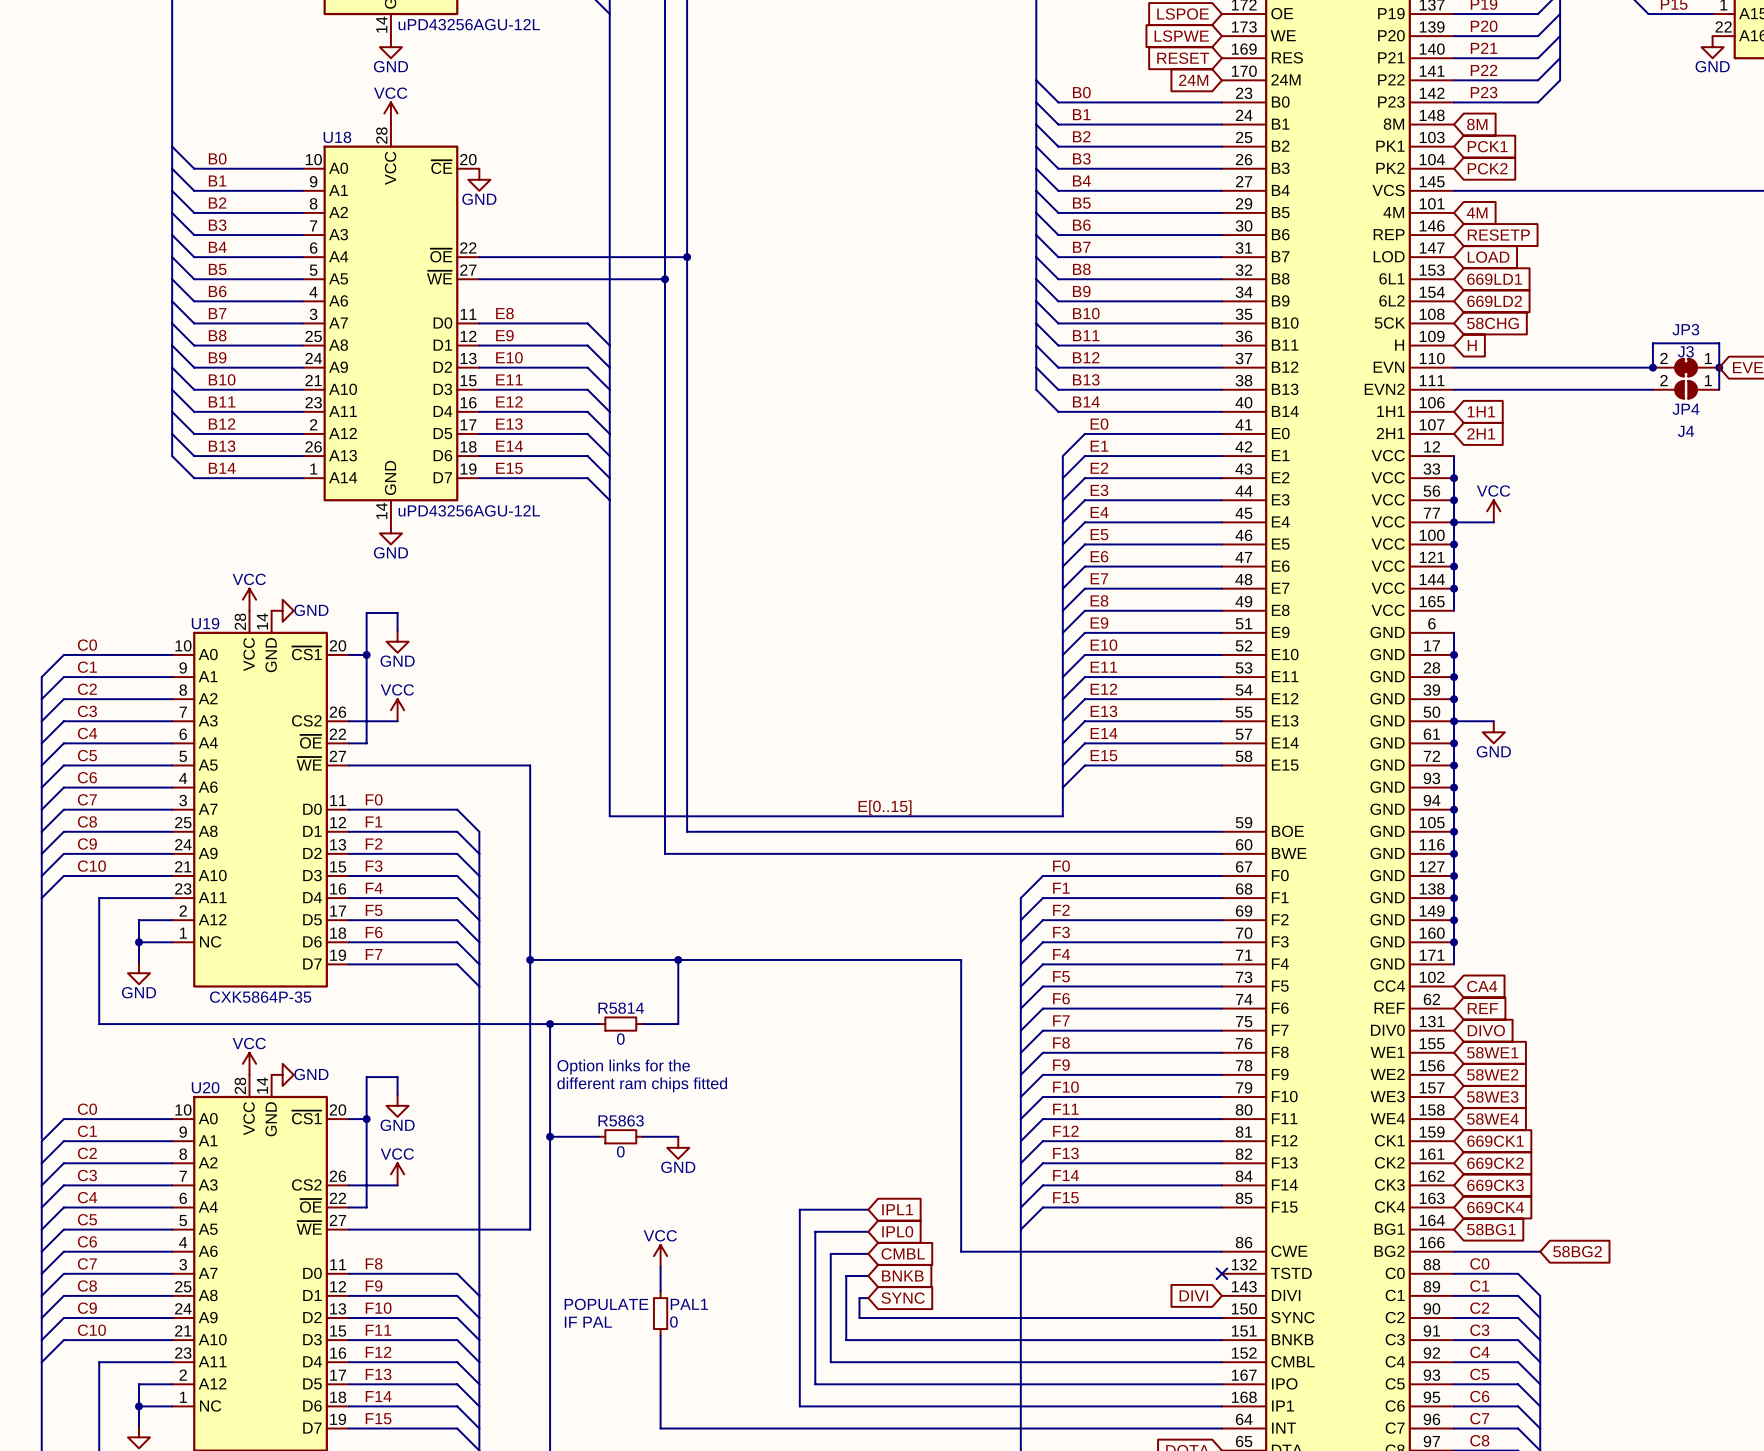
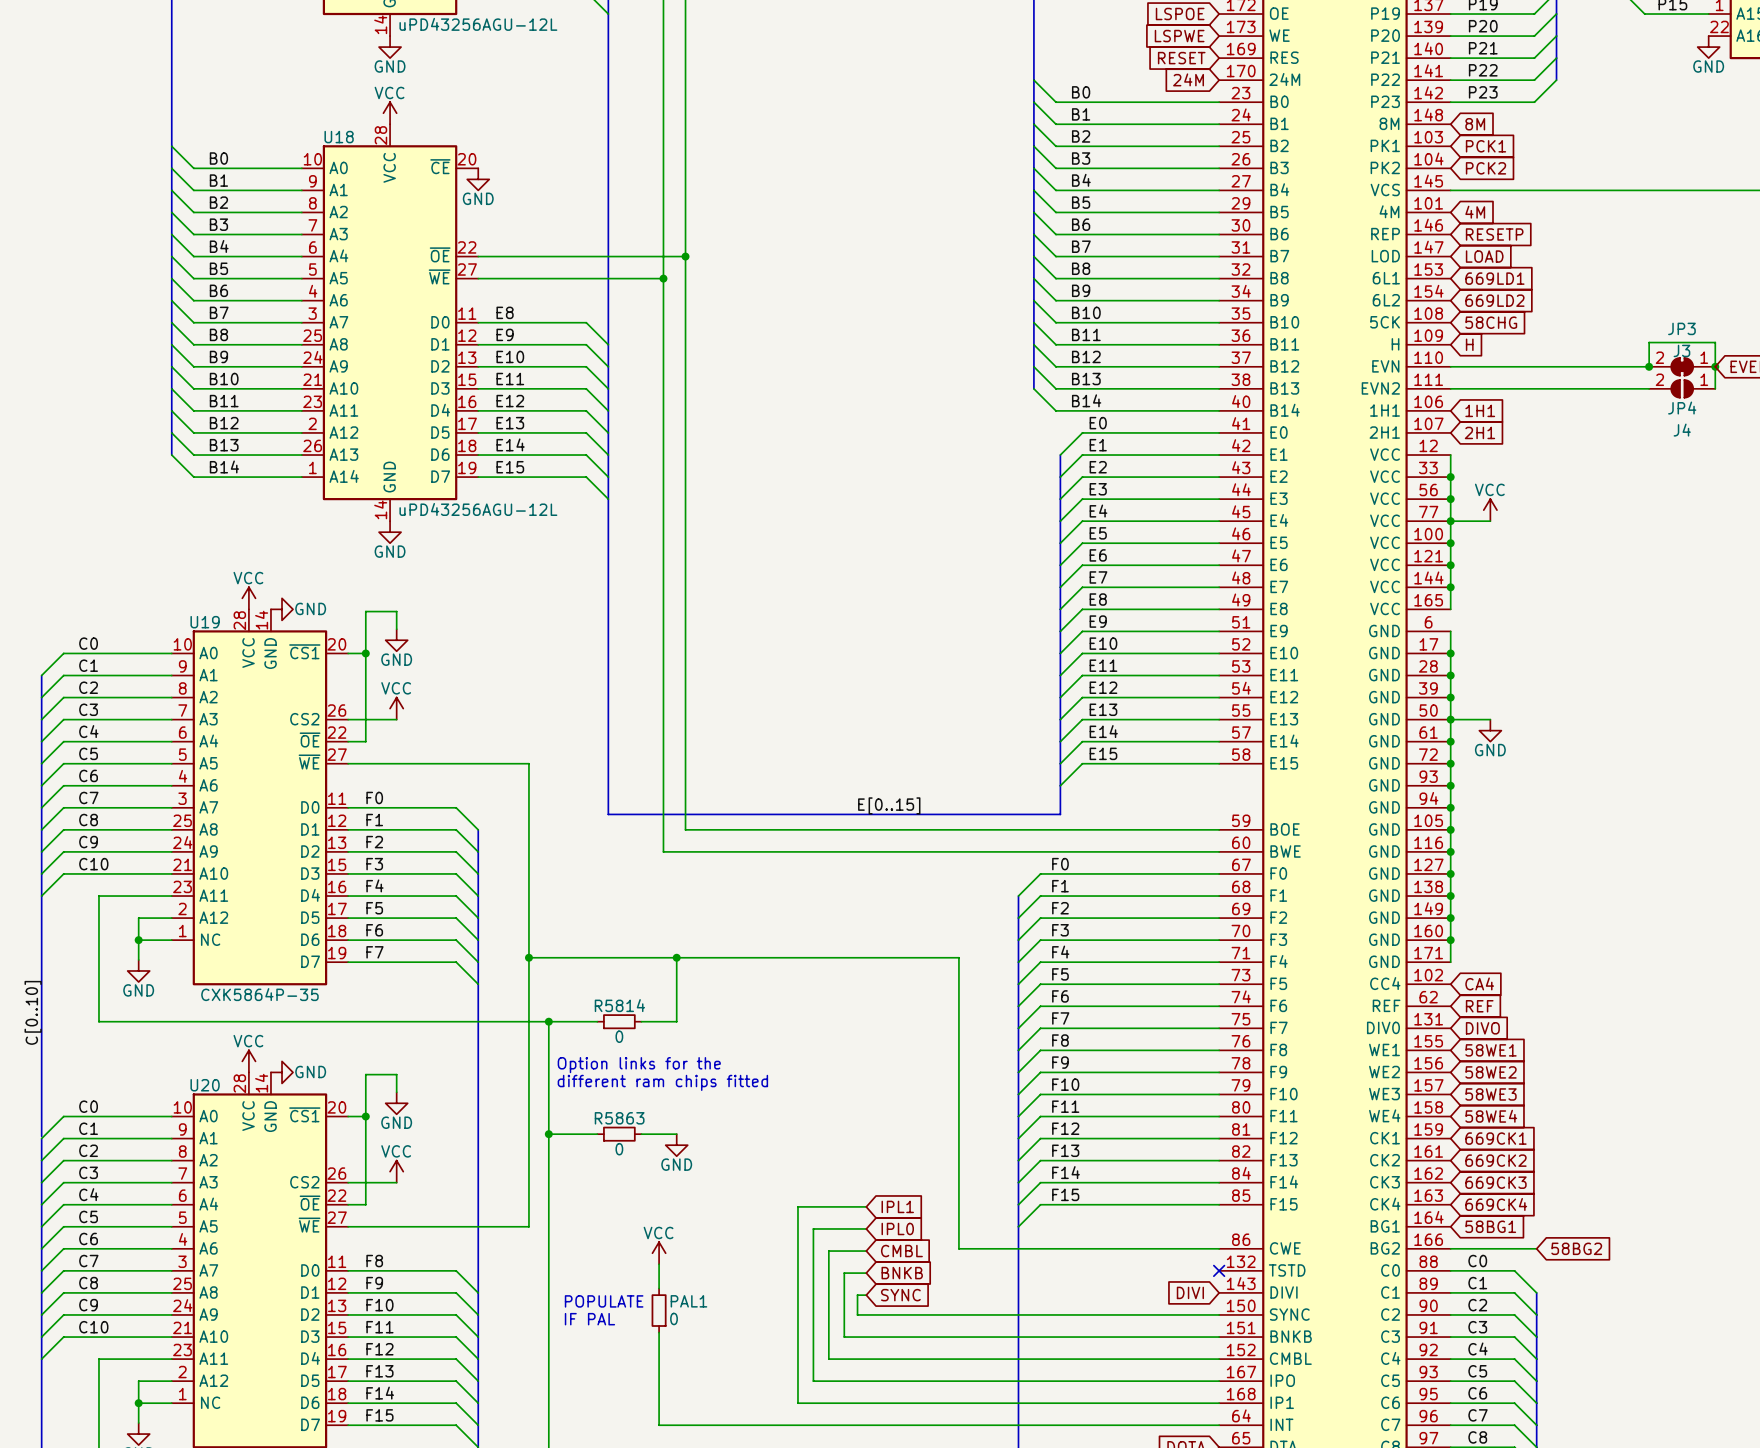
label: none -> C[0..10] (33, 1012)

